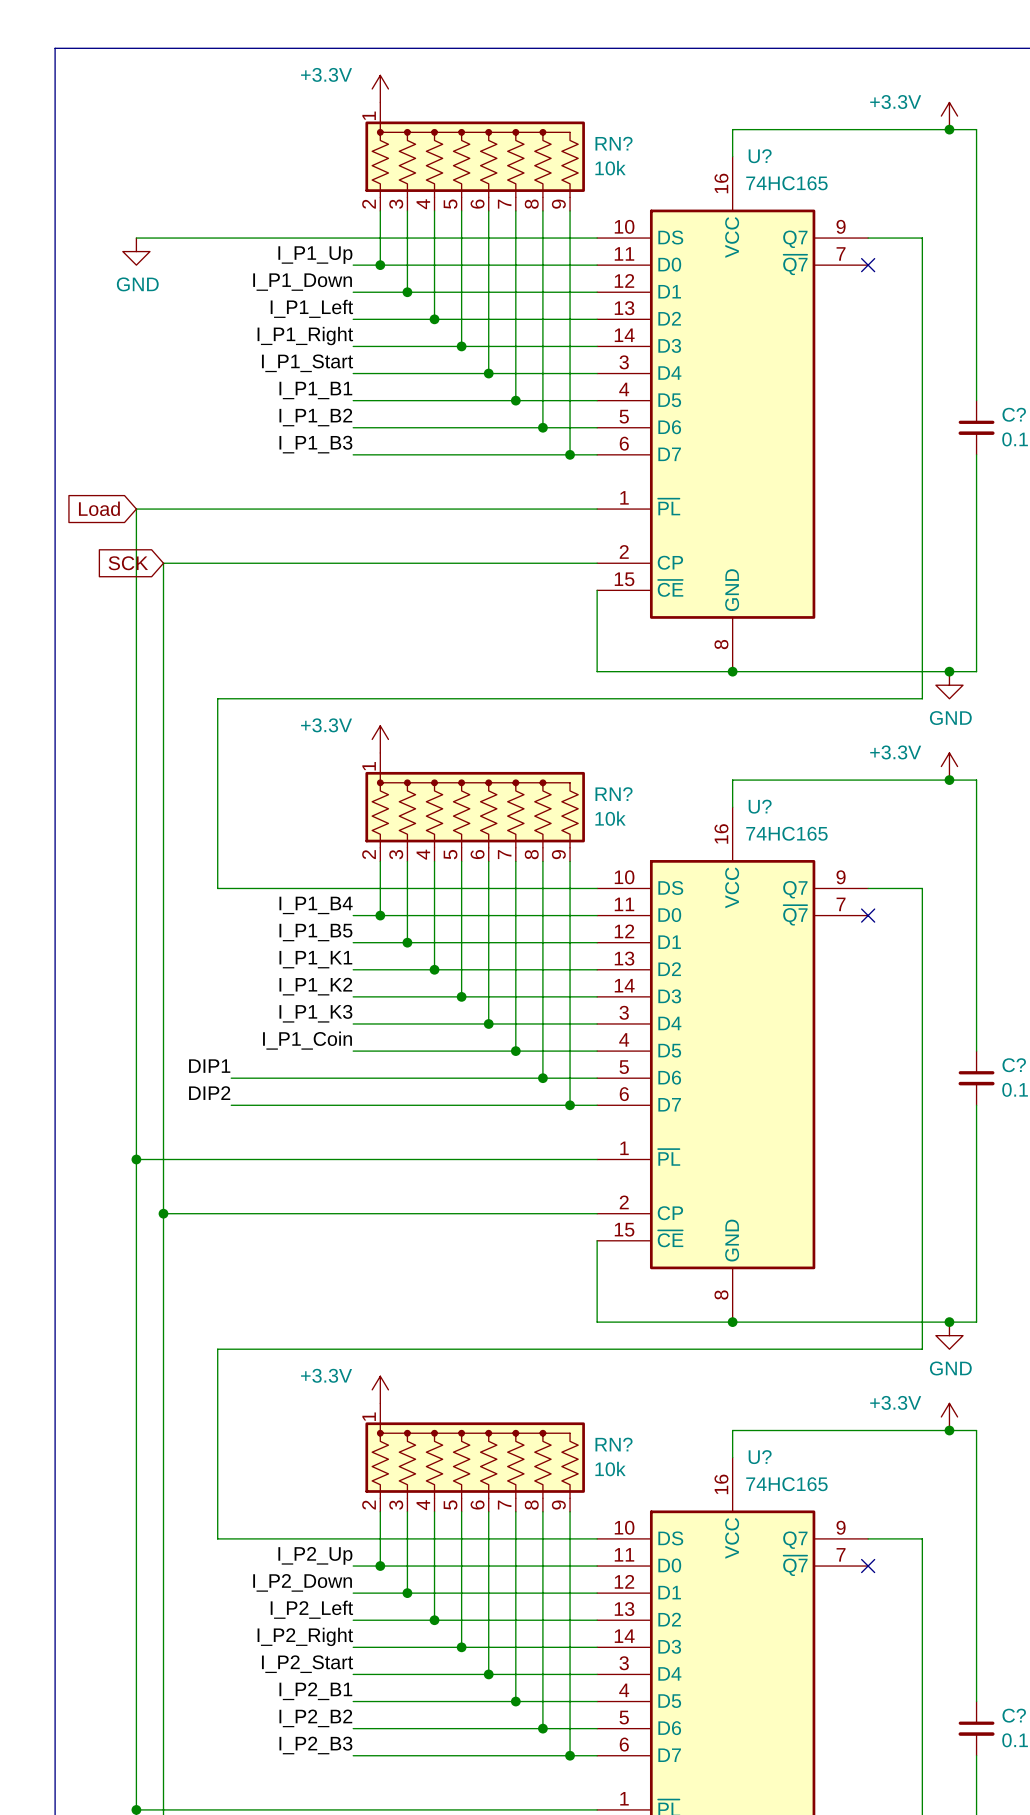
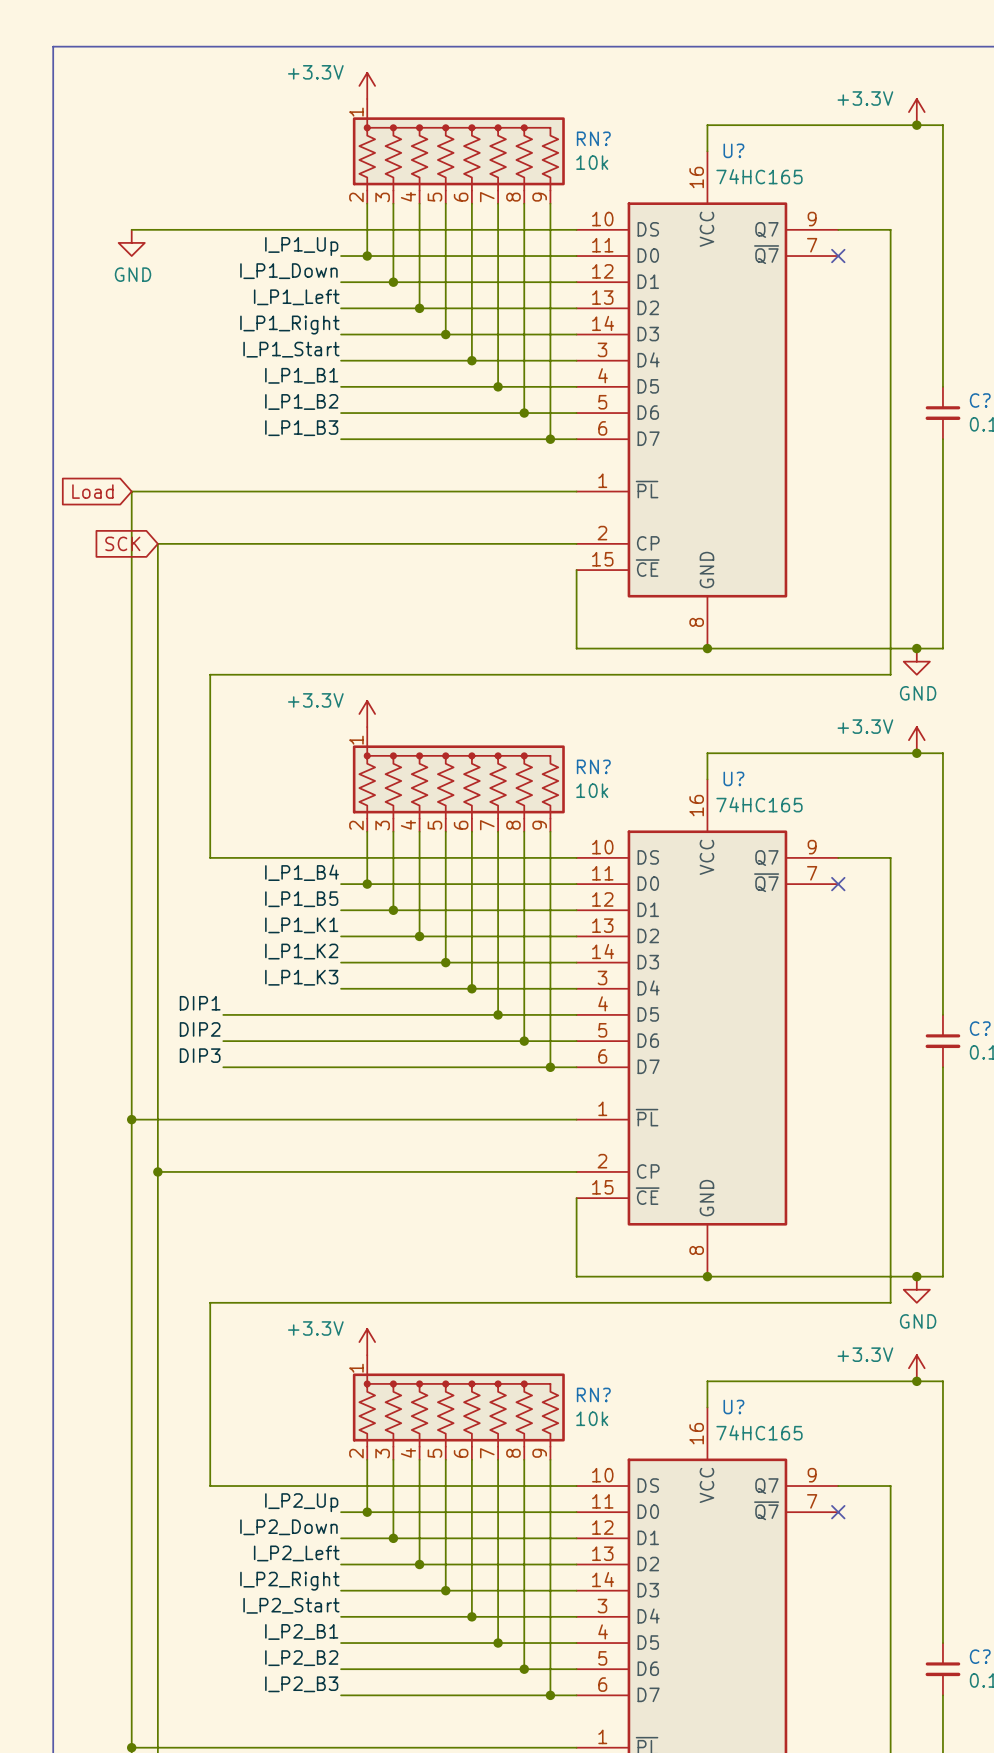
label: none -> DIP1 (200, 1003)
label: I_P1_Coin (307, 1040) -> none
wire: none -> (223, 1014) (341, 1014)
label: DIP1 (209, 1066) -> DIP2 (200, 1029)
label: DIP2 (209, 1093) -> DIP3 (200, 1055)

